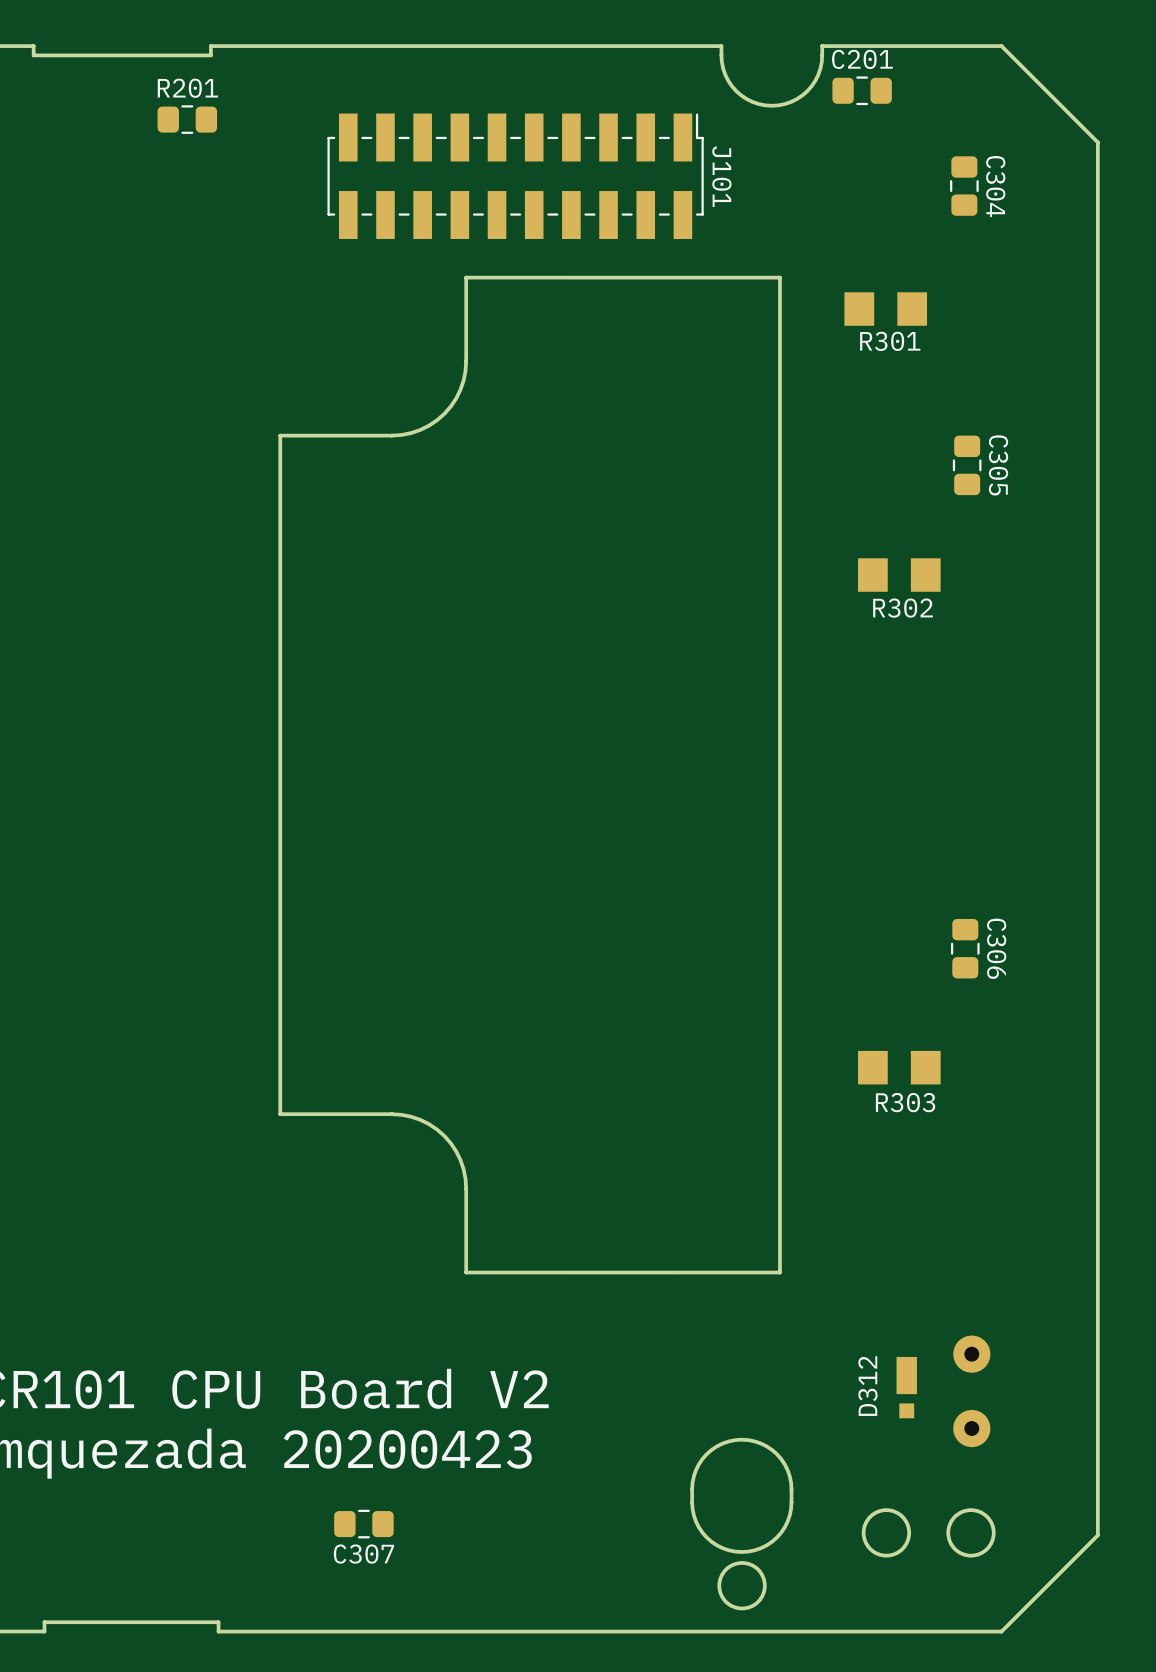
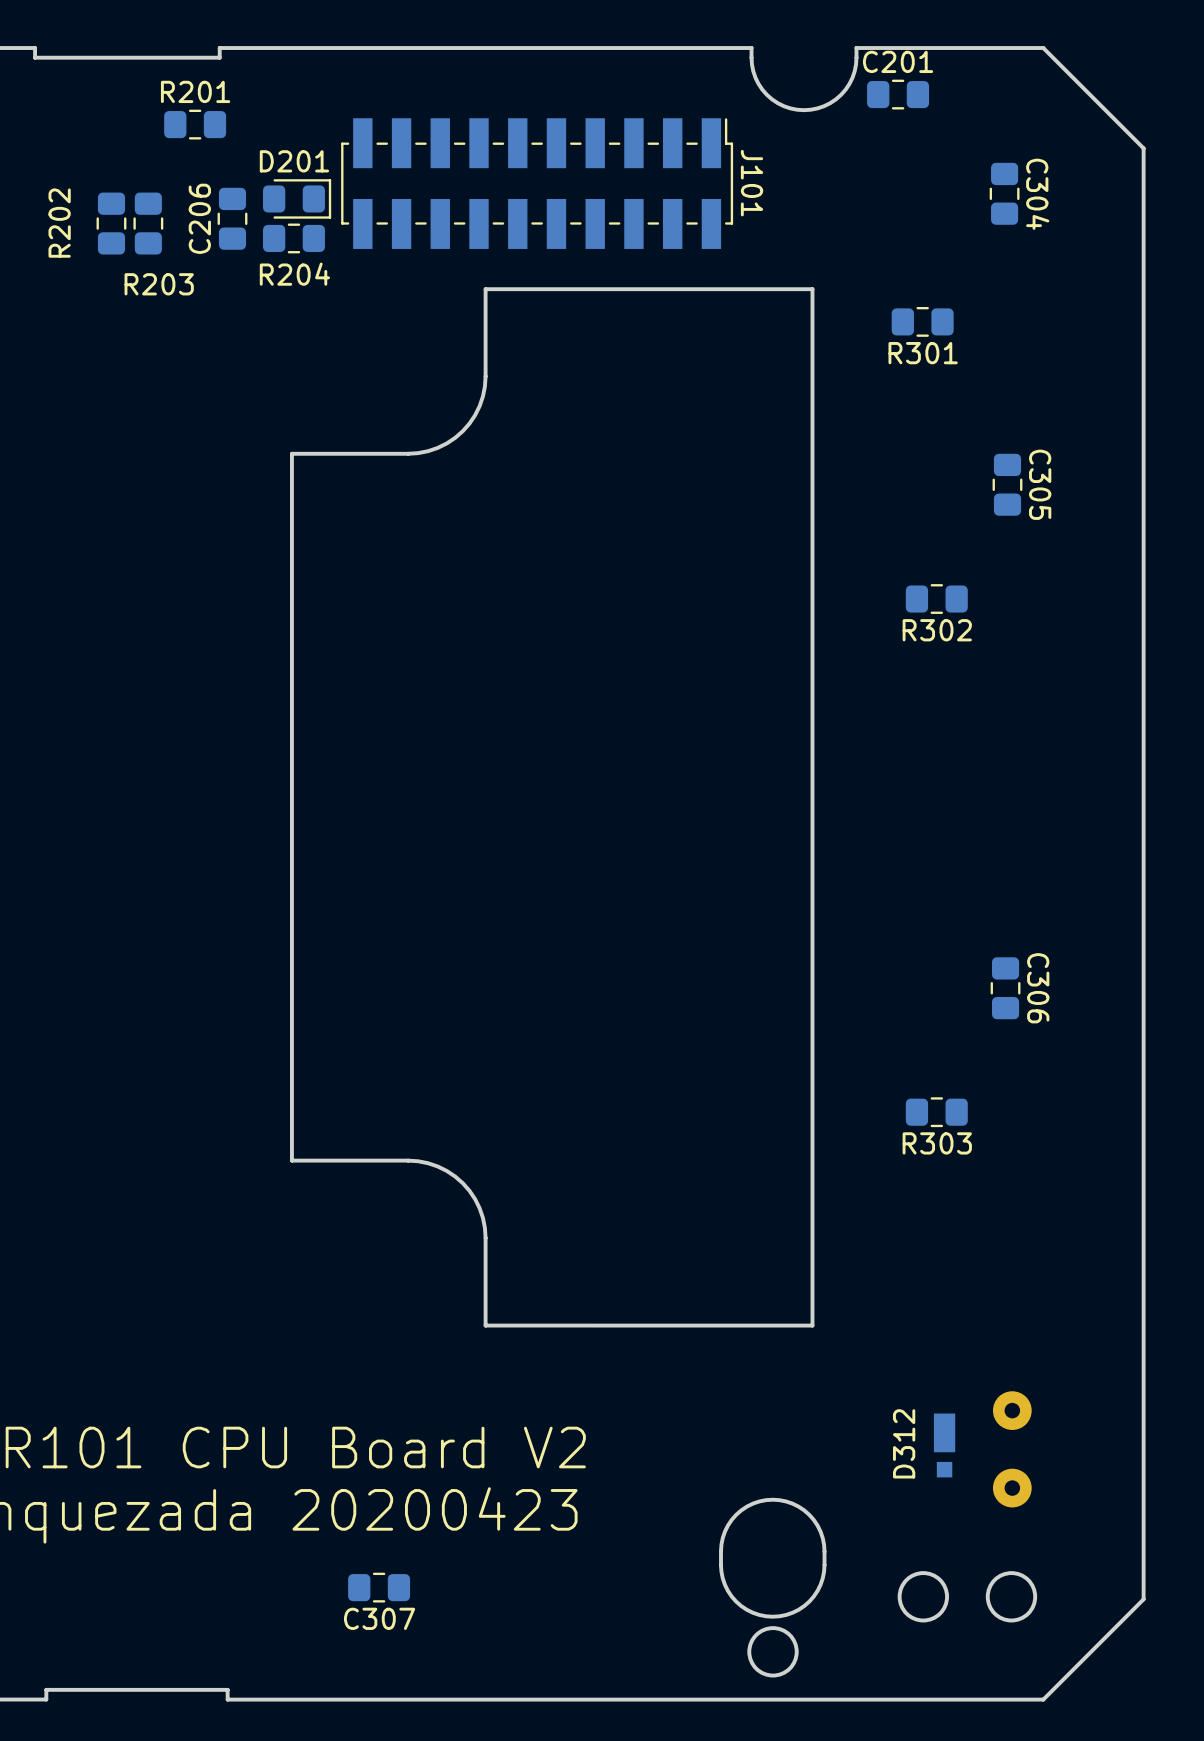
D201: none -> (297, 198)
C206: none -> (232, 218)
R203: none -> (111, 223)
R202: none -> (148, 223)
R204: none -> (293, 238)
R301 footprint: [844, 292, 928, 326] -> [891, 307, 954, 337]
R302 footprint: [858, 558, 941, 592] -> [905, 584, 968, 614]
R303 footprint: [858, 1050, 941, 1085] -> [905, 1097, 968, 1128]

